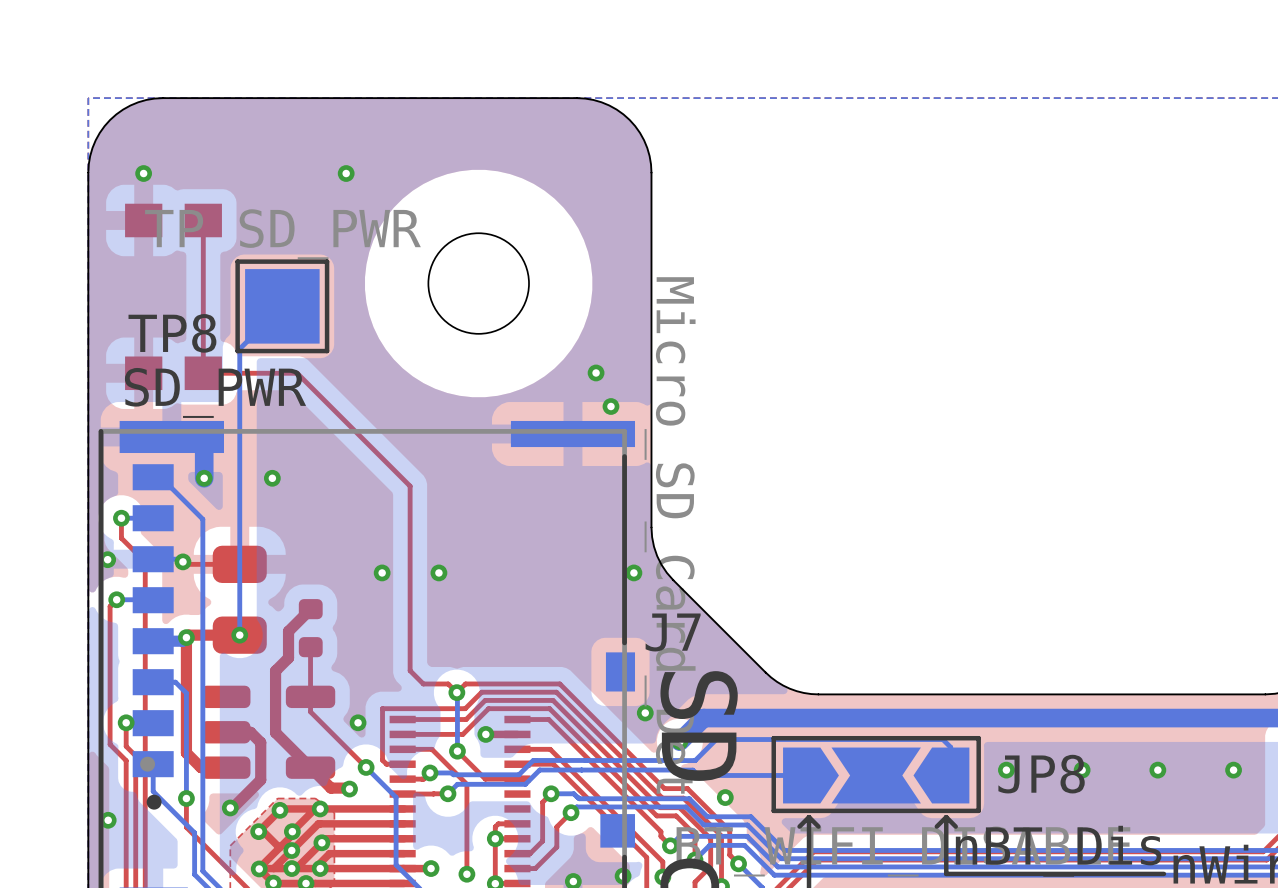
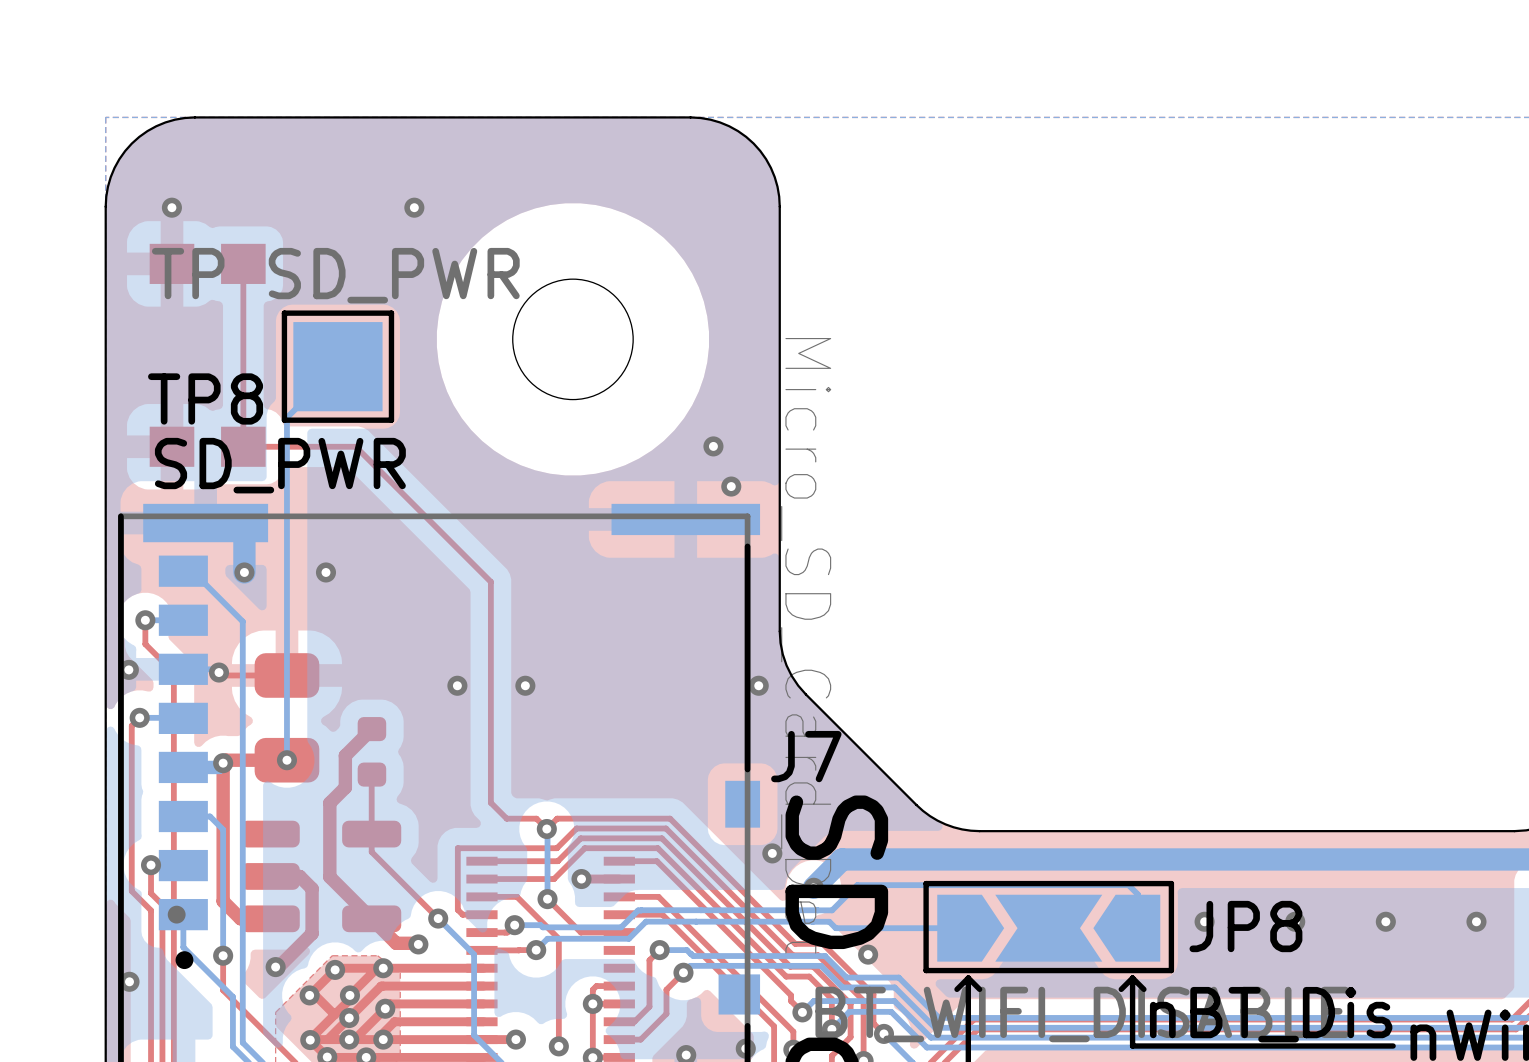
via: (358, 722) -> none

